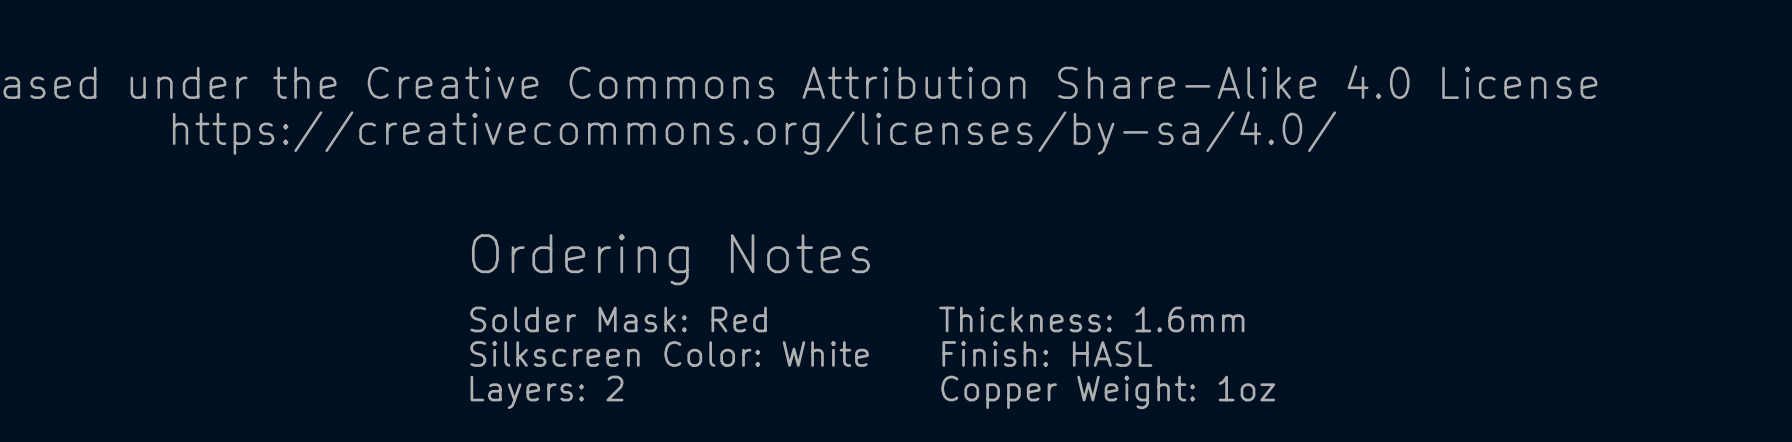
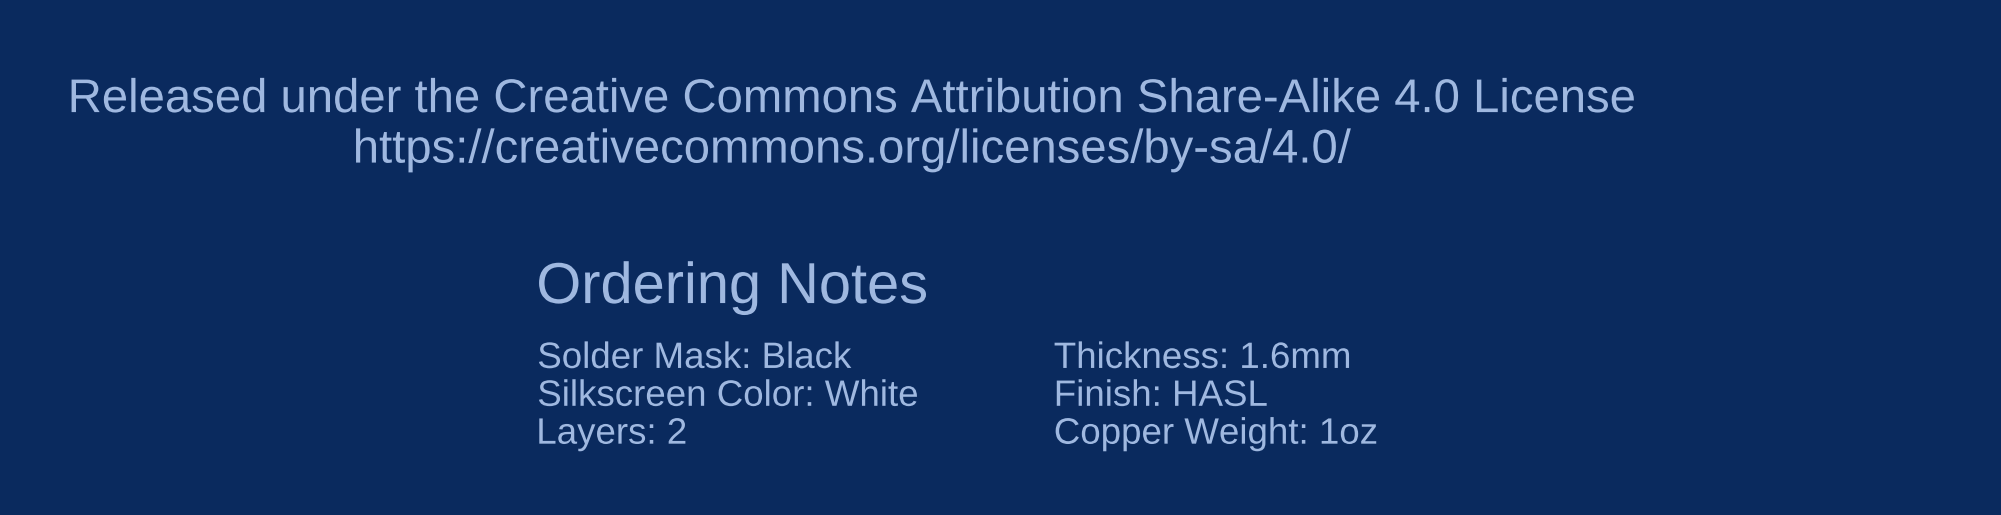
text: Solder Mask: Red (618, 319) -> Solder Mask: Black (695, 354)

